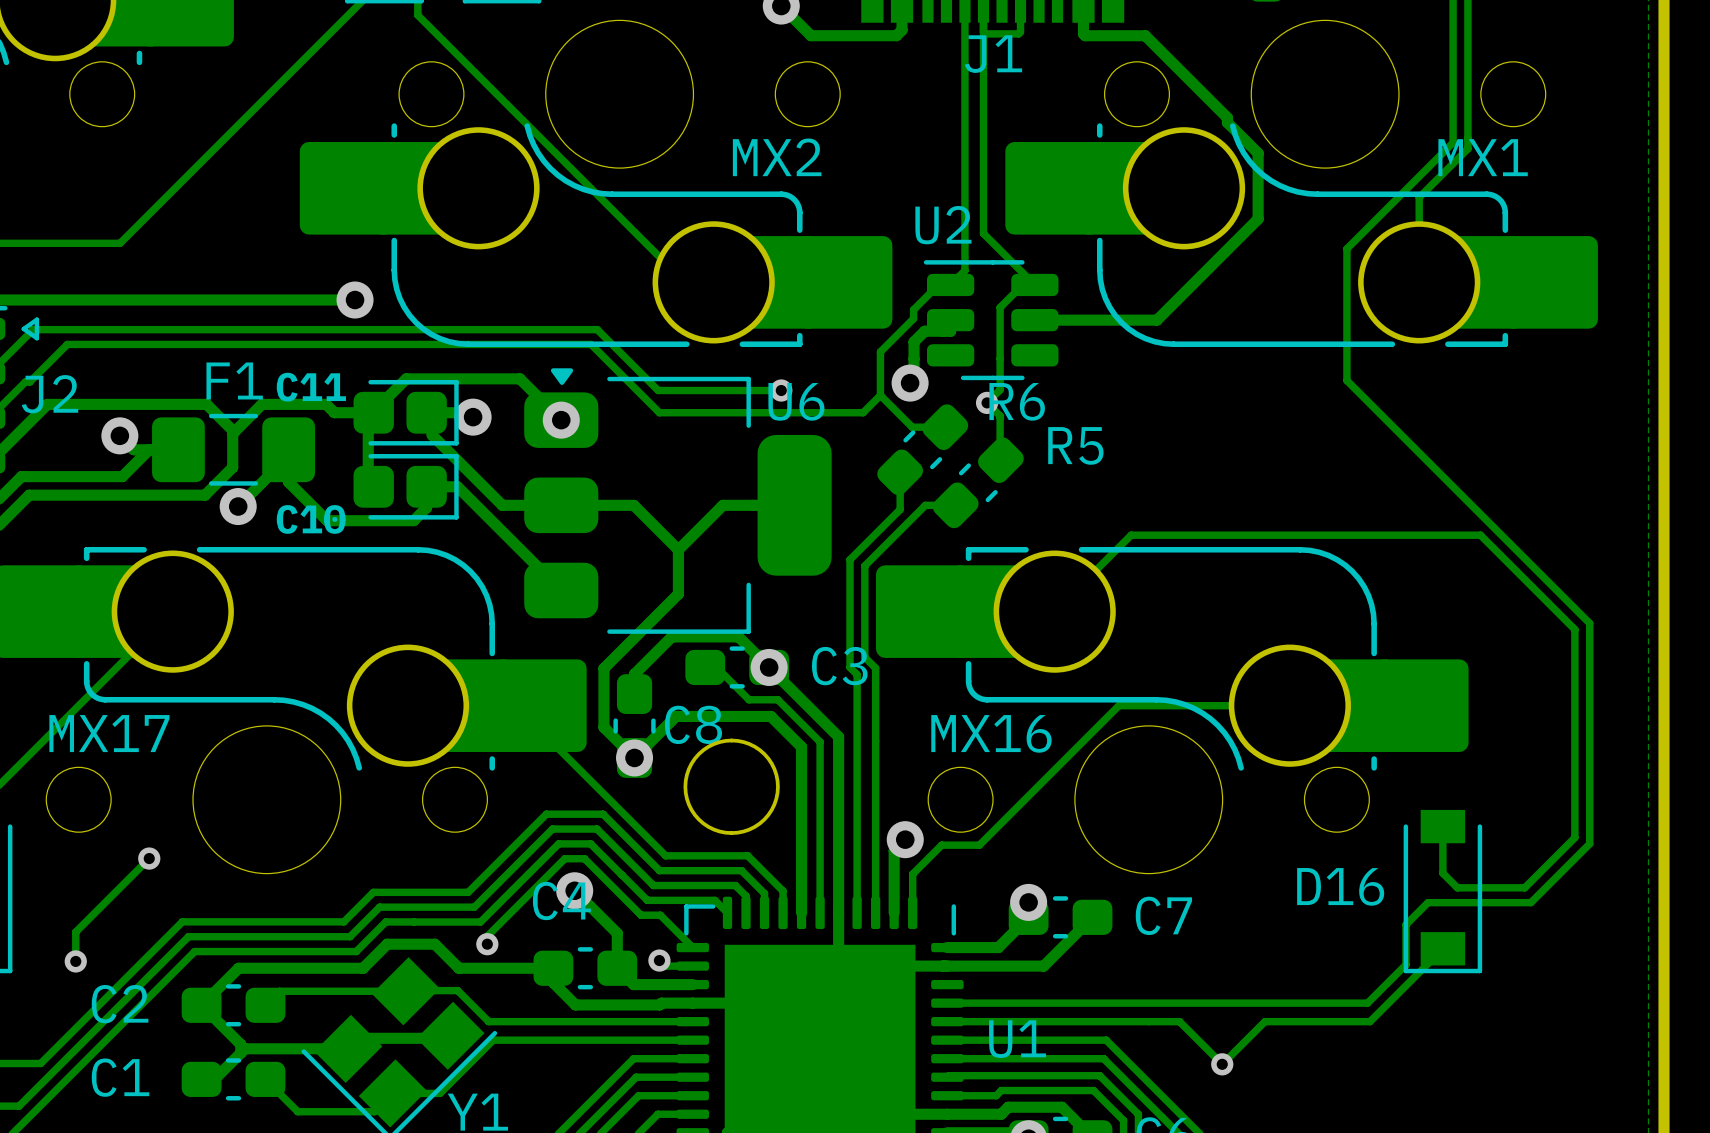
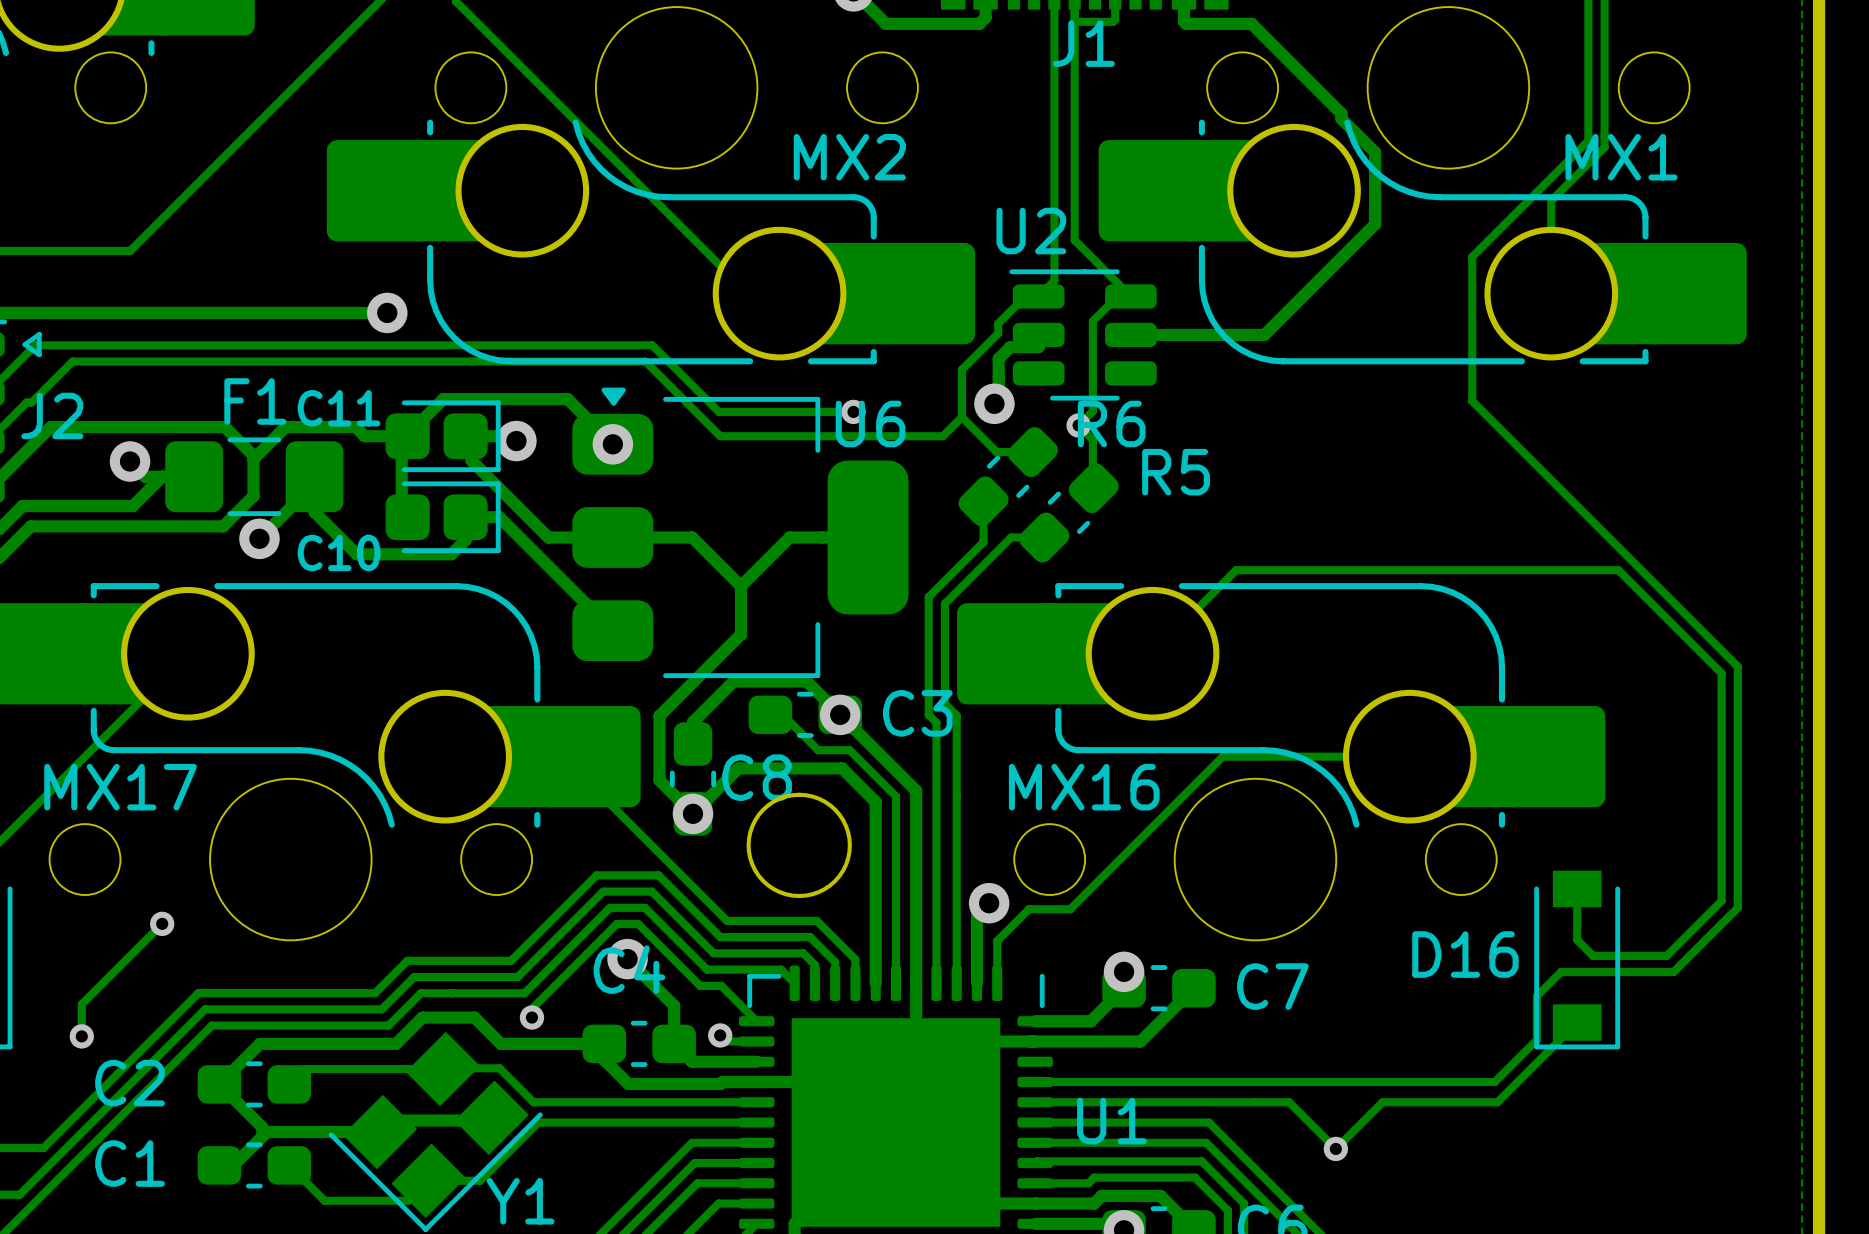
C4 name position: C4 (561, 901) -> C4 (629, 969)

